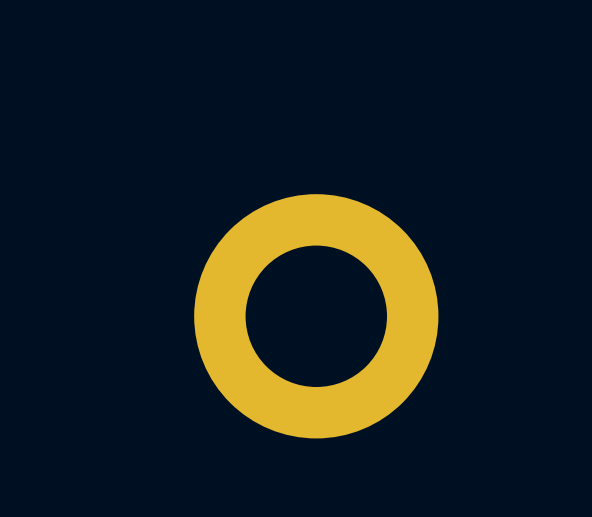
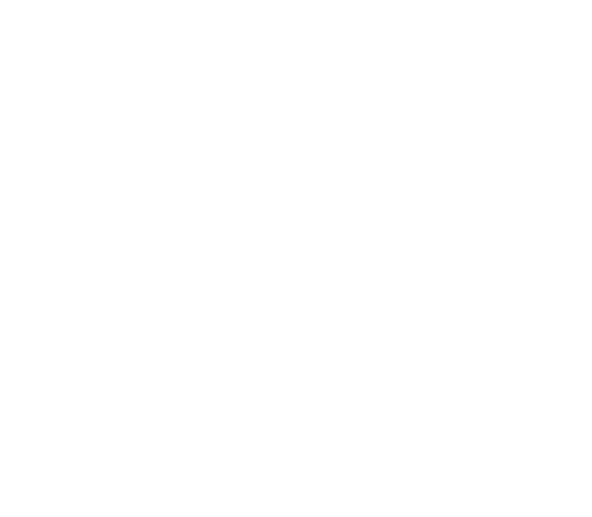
part: (316, 316) -> none

